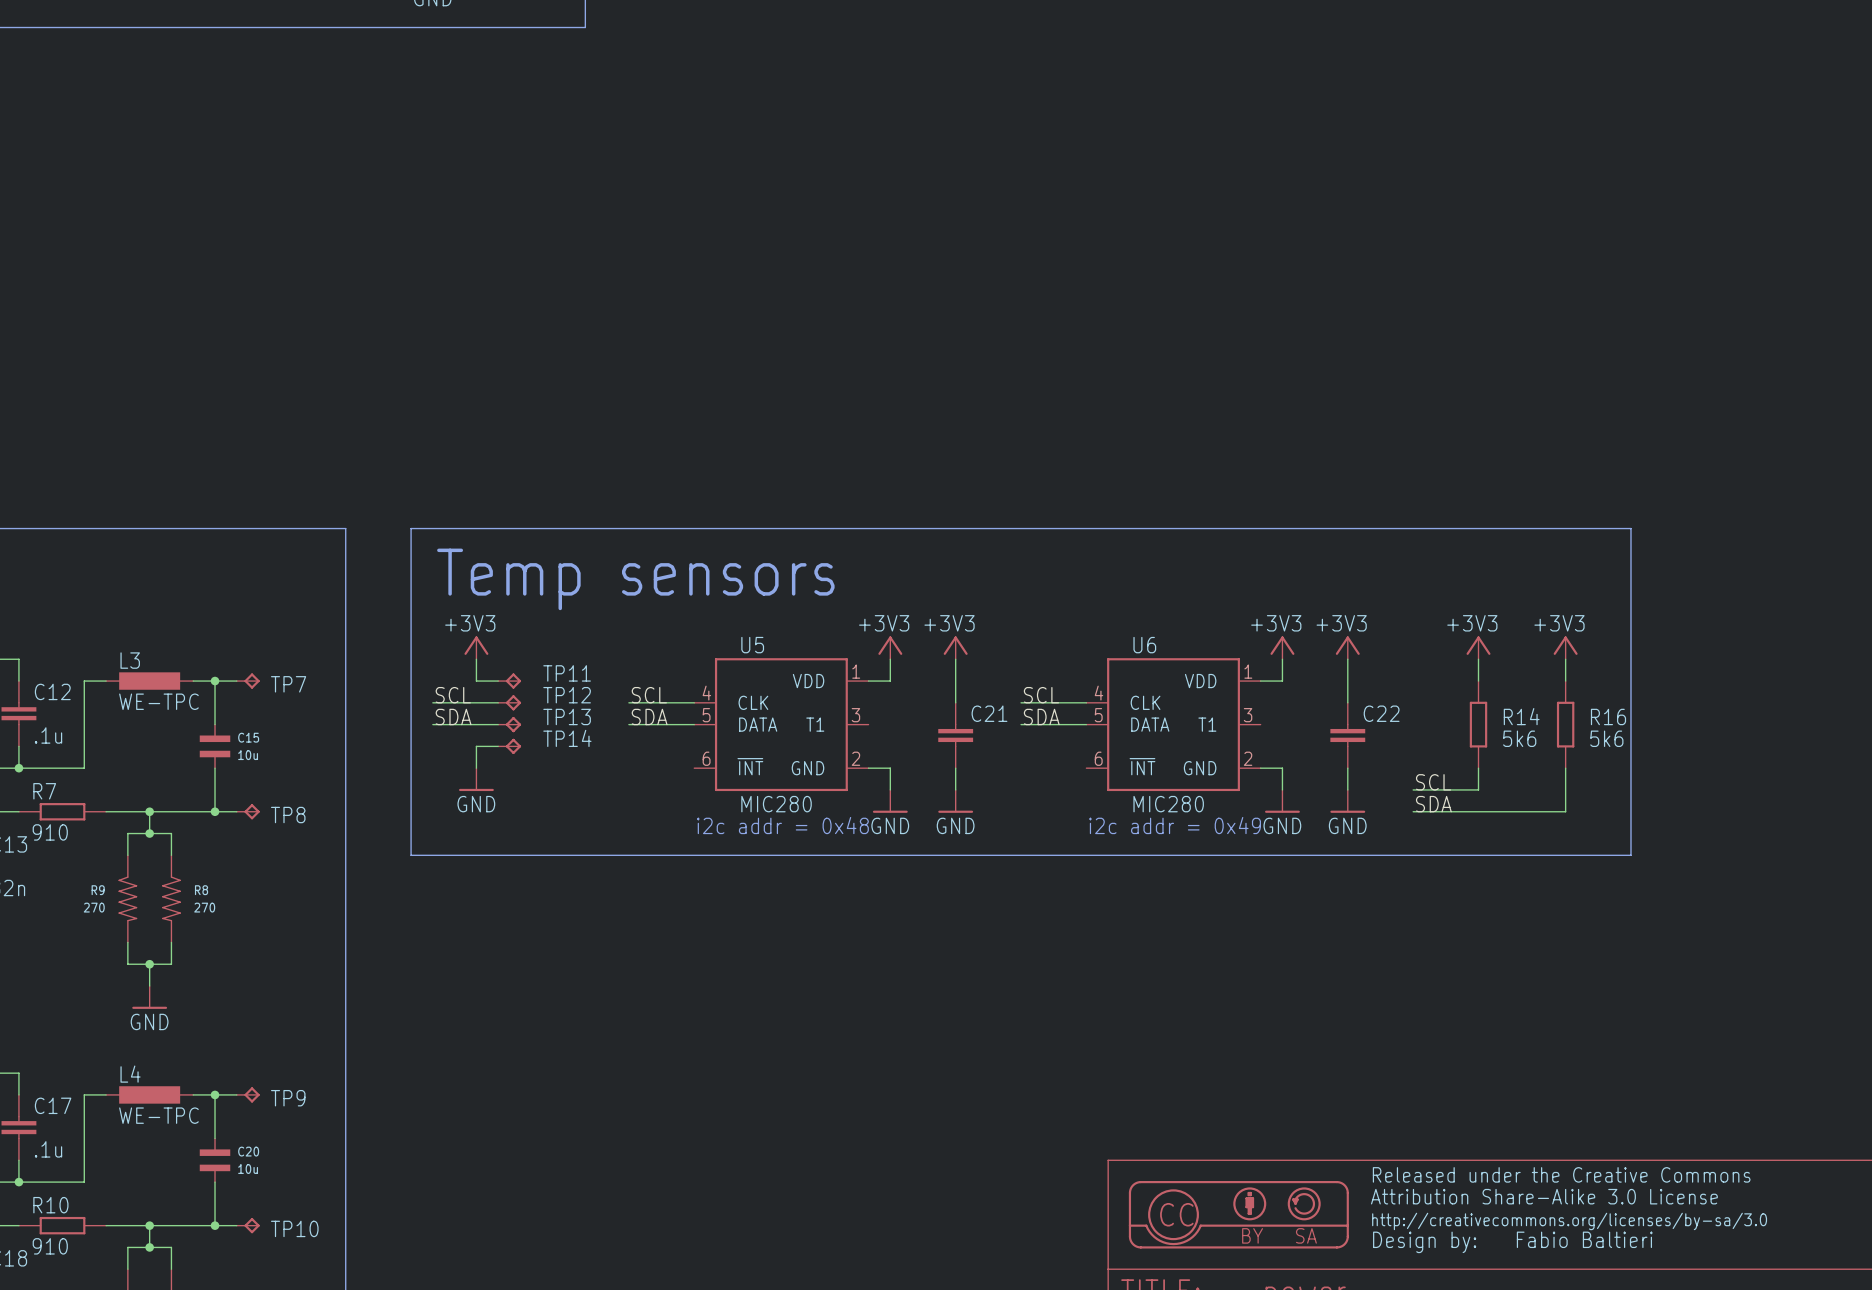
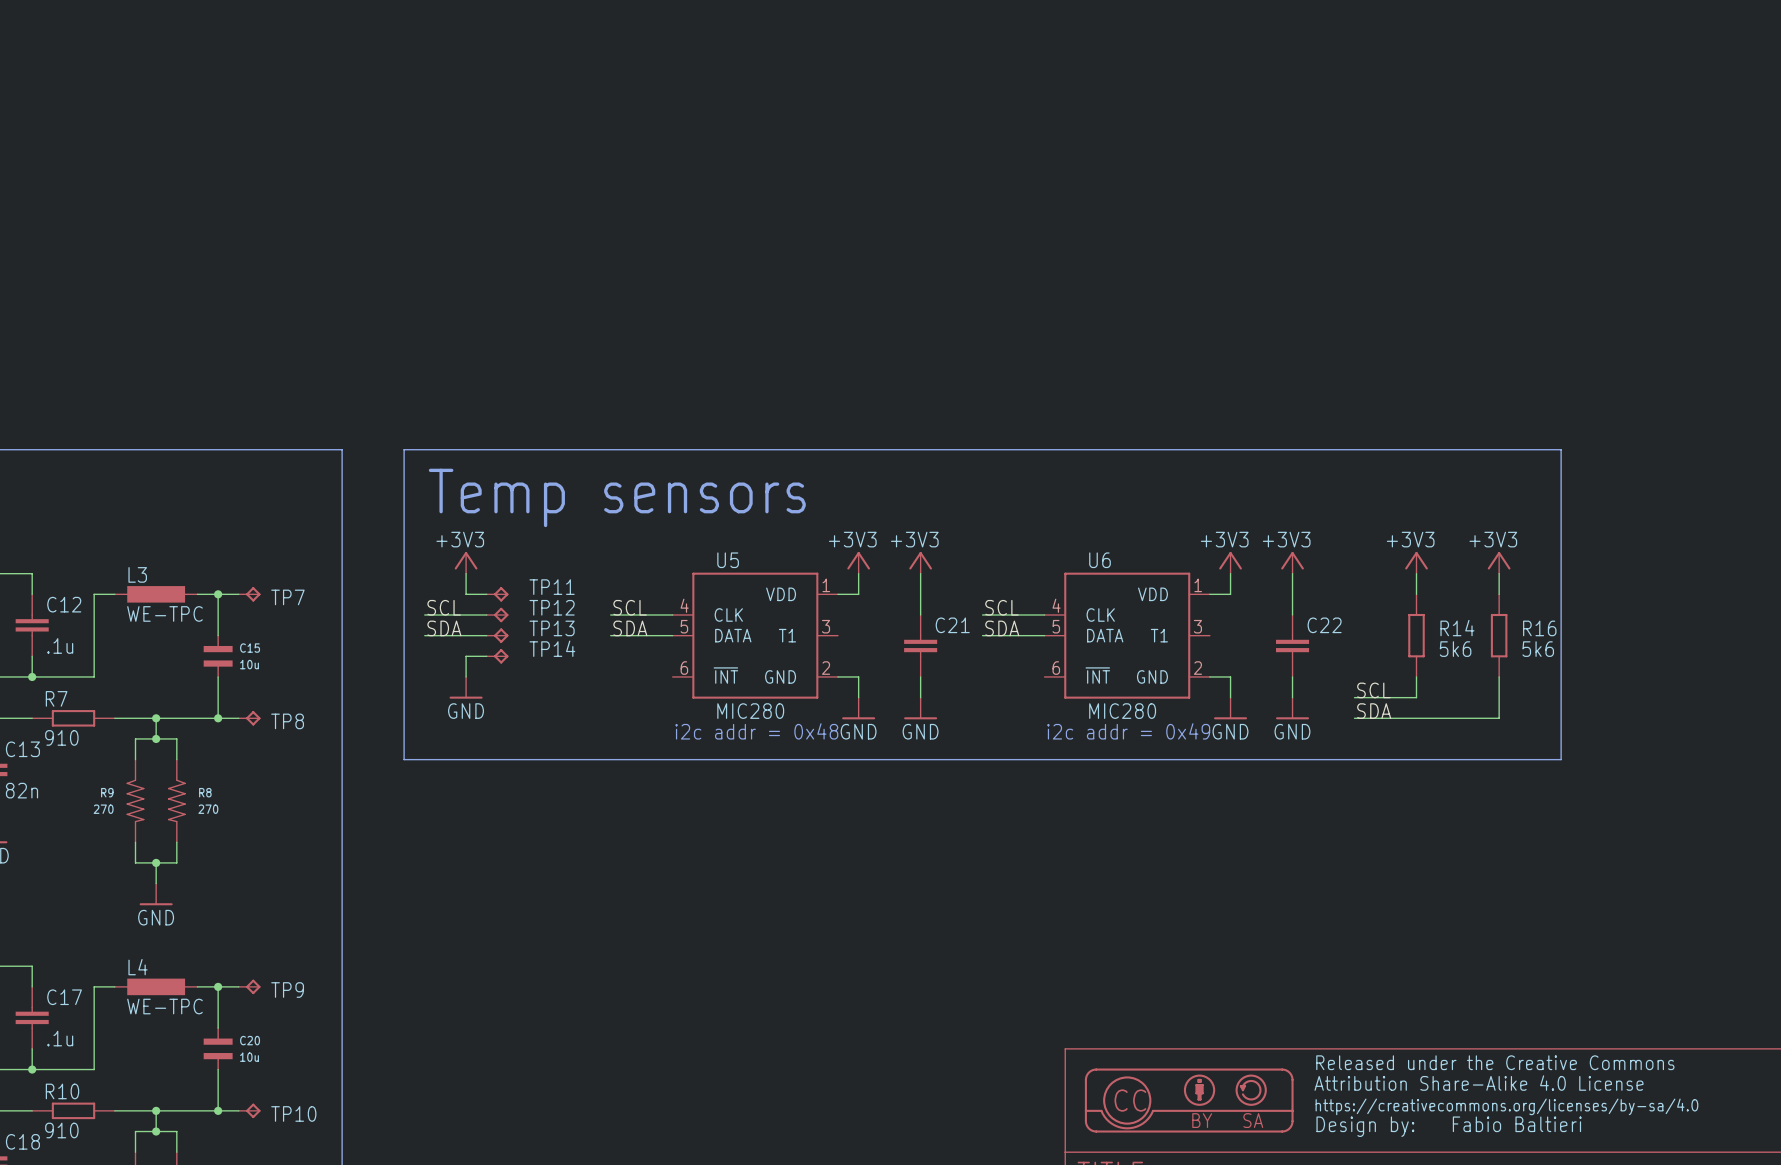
part text: Attribution Share-Alike 3.0 License (1544, 1196) -> Attribution Share-Alike 4.0 License (1479, 1083)
part text: http://creativecommons.org/licenses/by-sa/3.0 (1569, 1221) -> https://creativecommons.org/licenses/by-sa/4.0 (1506, 1106)

